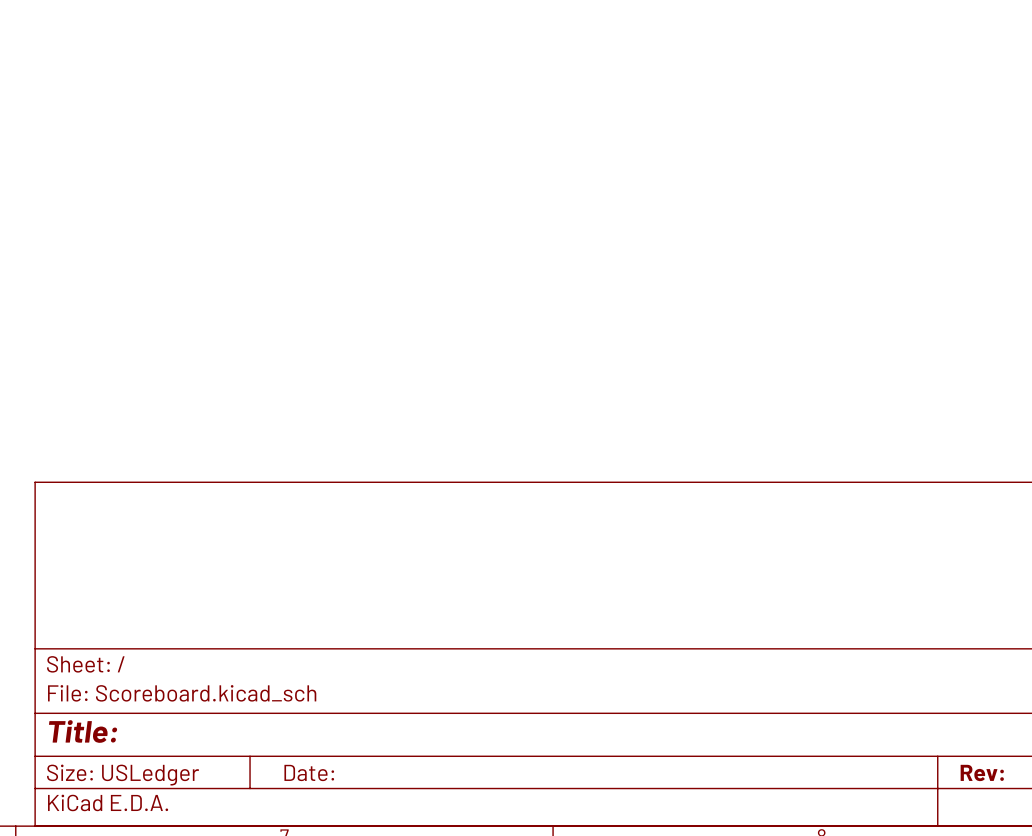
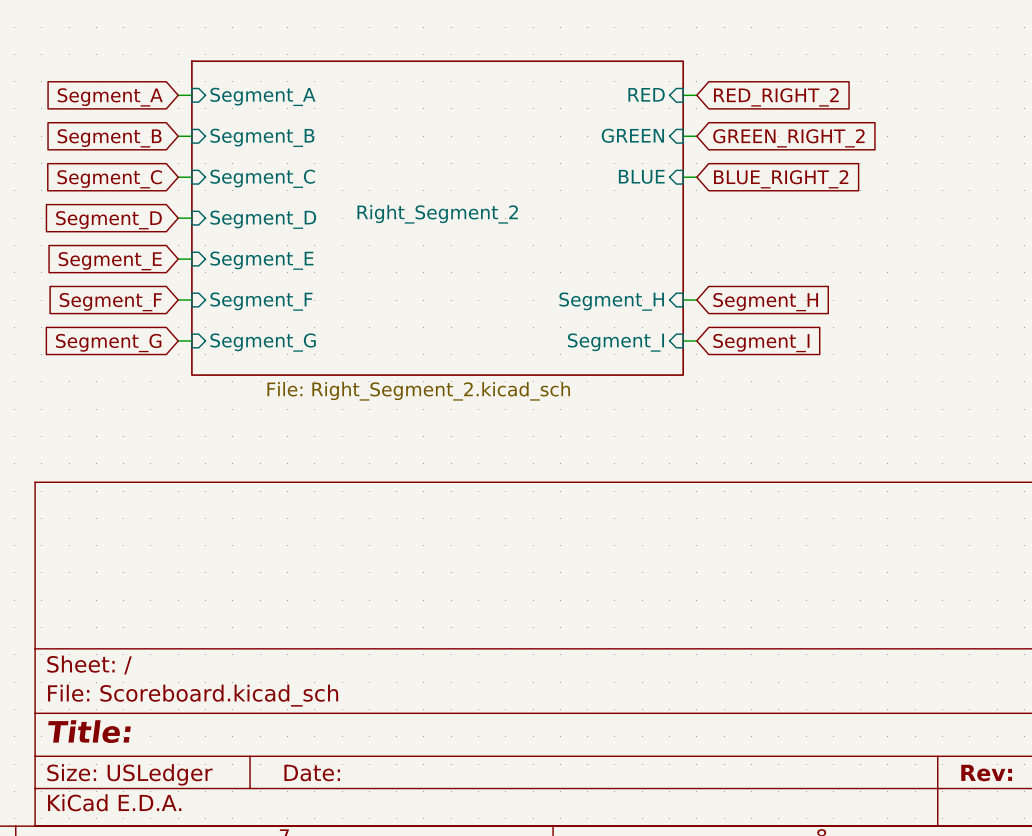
sheet pin: none -> RED (646, 94)
wire: none -> (178, 95) (191, 95)
wire: none -> (683, 95) (696, 95)
global label: none -> RED_RIGHT_2 (776, 97)
sheet pin: none -> Segment_A (262, 96)
global label: none -> Segment_A (110, 97)
sheet pin: none -> GREEN (632, 135)
wire: none -> (178, 136) (191, 136)
wire: none -> (683, 136) (696, 136)
global label: none -> GREEN_RIGHT_2 (788, 138)
sheet pin: none -> Segment_B (262, 137)
global label: none -> Segment_B (109, 138)
sheet pin: none -> BLUE (641, 176)
wire: none -> (178, 177) (191, 177)
wire: none -> (683, 177) (696, 177)
global label: none -> BLUE_RIGHT_2 (781, 179)
sheet pin: none -> Segment_C (262, 178)
global label: none -> Segment_C (109, 179)
wire: none -> (178, 218) (191, 218)
sheet Right_Segment_2: none -> File: Right_Segment_2.kicad_sch (437, 218)
sheet pin: none -> Segment_D (263, 219)
global label: none -> Segment_D (108, 220)
wire: none -> (178, 259) (191, 259)
global label: none -> Segment_E (110, 261)
sheet pin: none -> Segment_E (261, 260)
wire: none -> (178, 300) (191, 300)
wire: none -> (683, 300) (696, 300)
global label: none -> Segment_F (110, 302)
sheet pin: none -> Segment_F (261, 301)
sheet pin: none -> Segment_H (611, 301)
global label: none -> Segment_H (765, 302)
wire: none -> (178, 340) (191, 340)
wire: none -> (683, 340) (696, 340)
global label: none -> Segment_G (108, 343)
sheet pin: none -> Segment_G (263, 342)
sheet pin: none -> Segment_I (615, 342)
global label: none -> Segment_I (761, 343)

